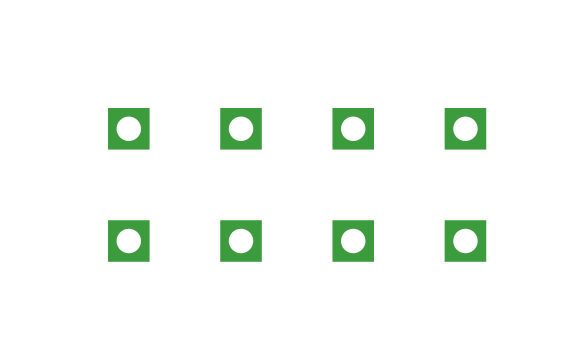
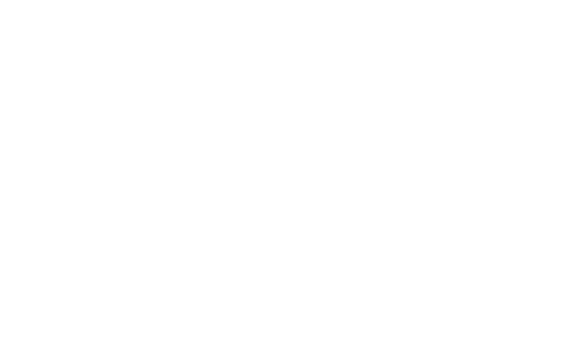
part: (128, 128) -> none
part: (241, 128) -> none
part: (353, 128) -> none
part: (465, 128) -> none
part: (128, 241) -> none
part: (241, 241) -> none
part: (353, 241) -> none
part: (465, 241) -> none

